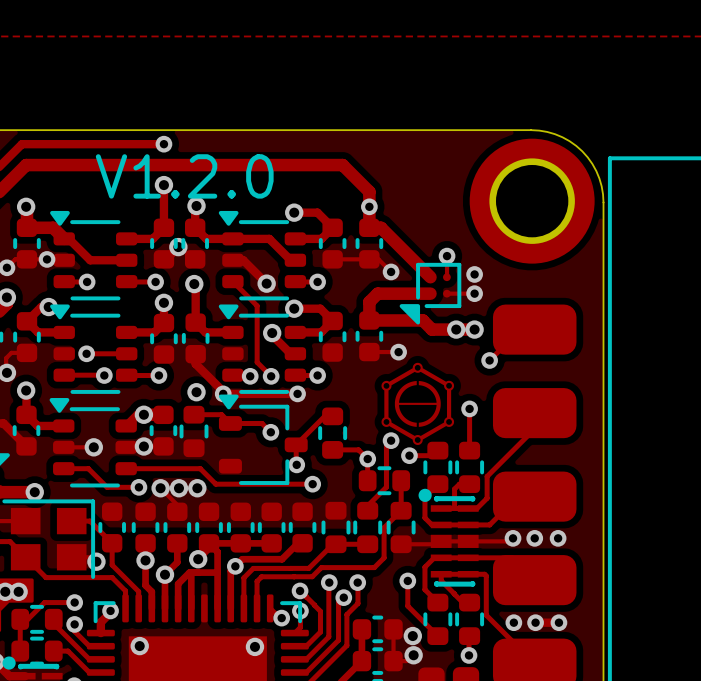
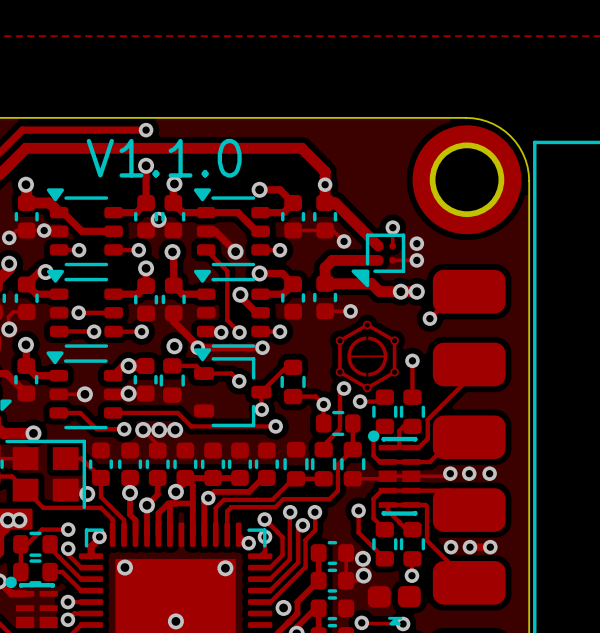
text: V1.2.0 (184, 176) -> V1.1.0 (164, 158)

